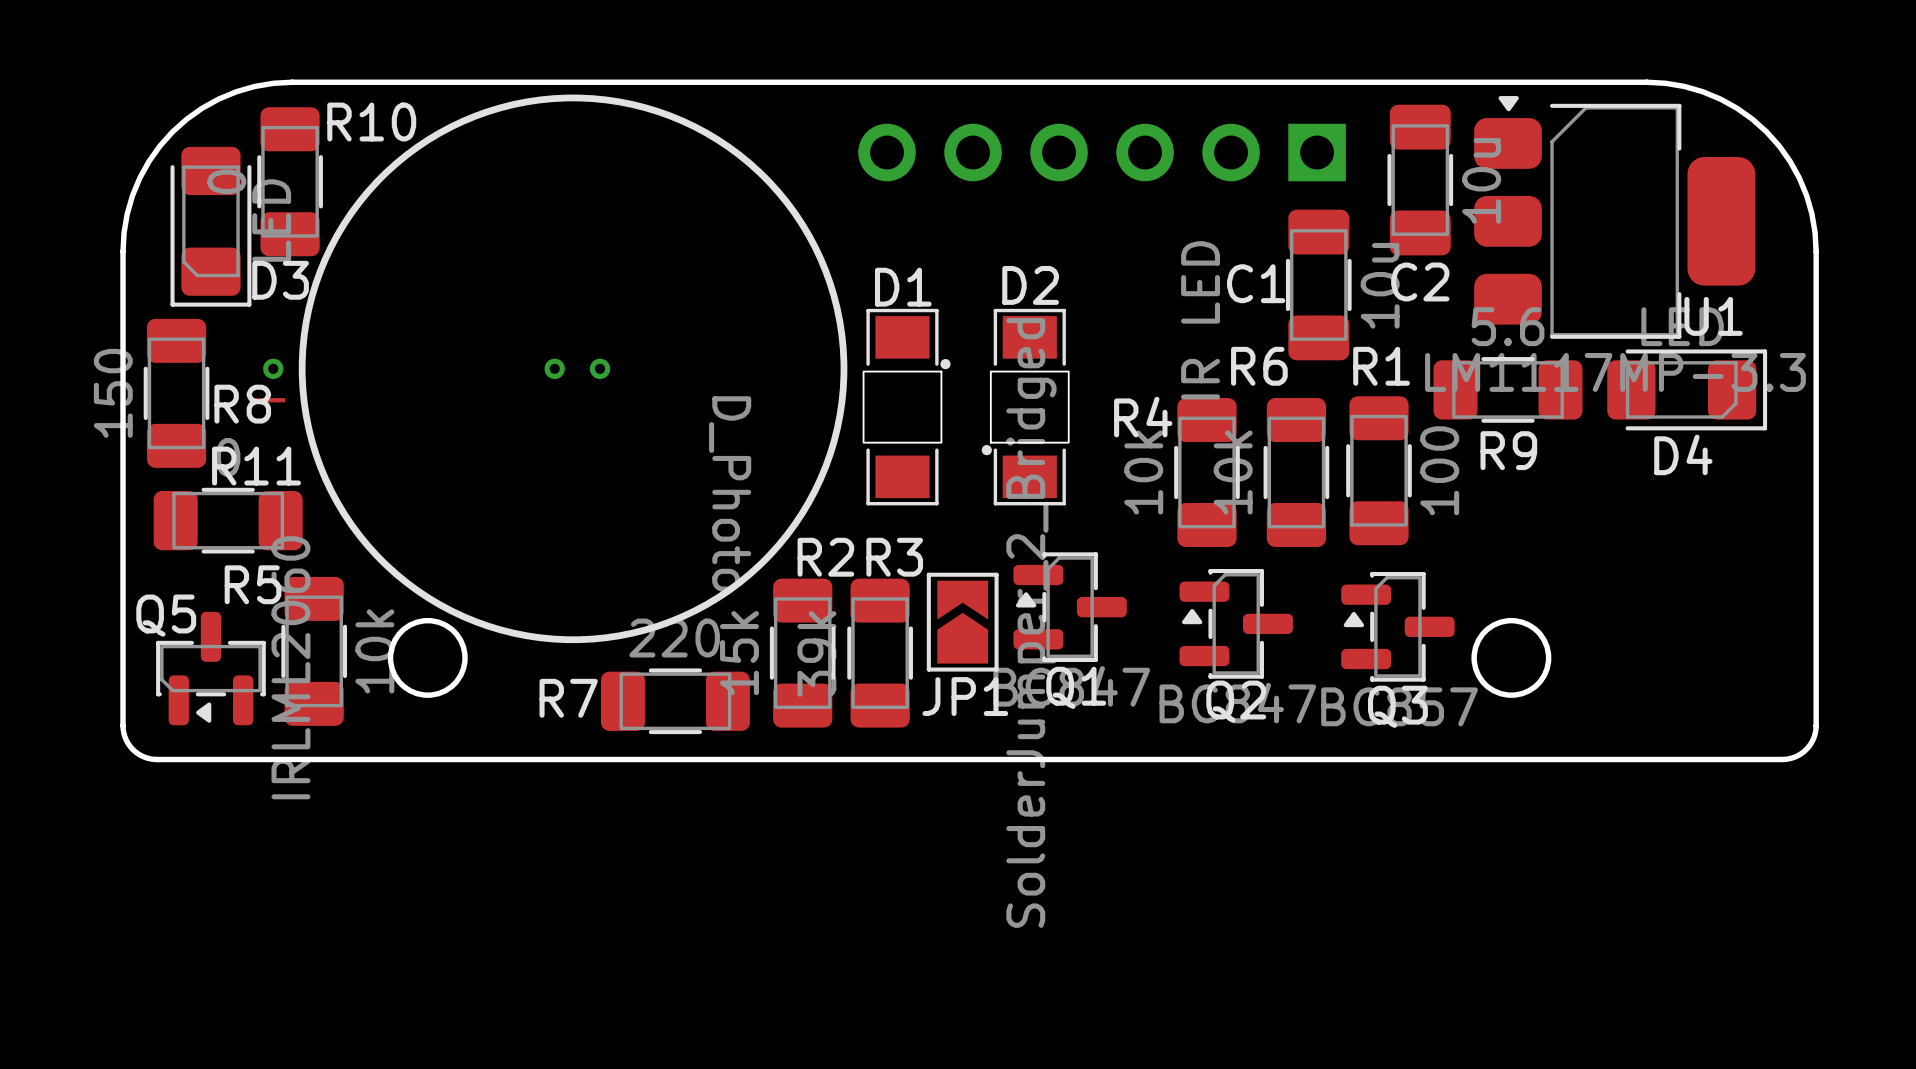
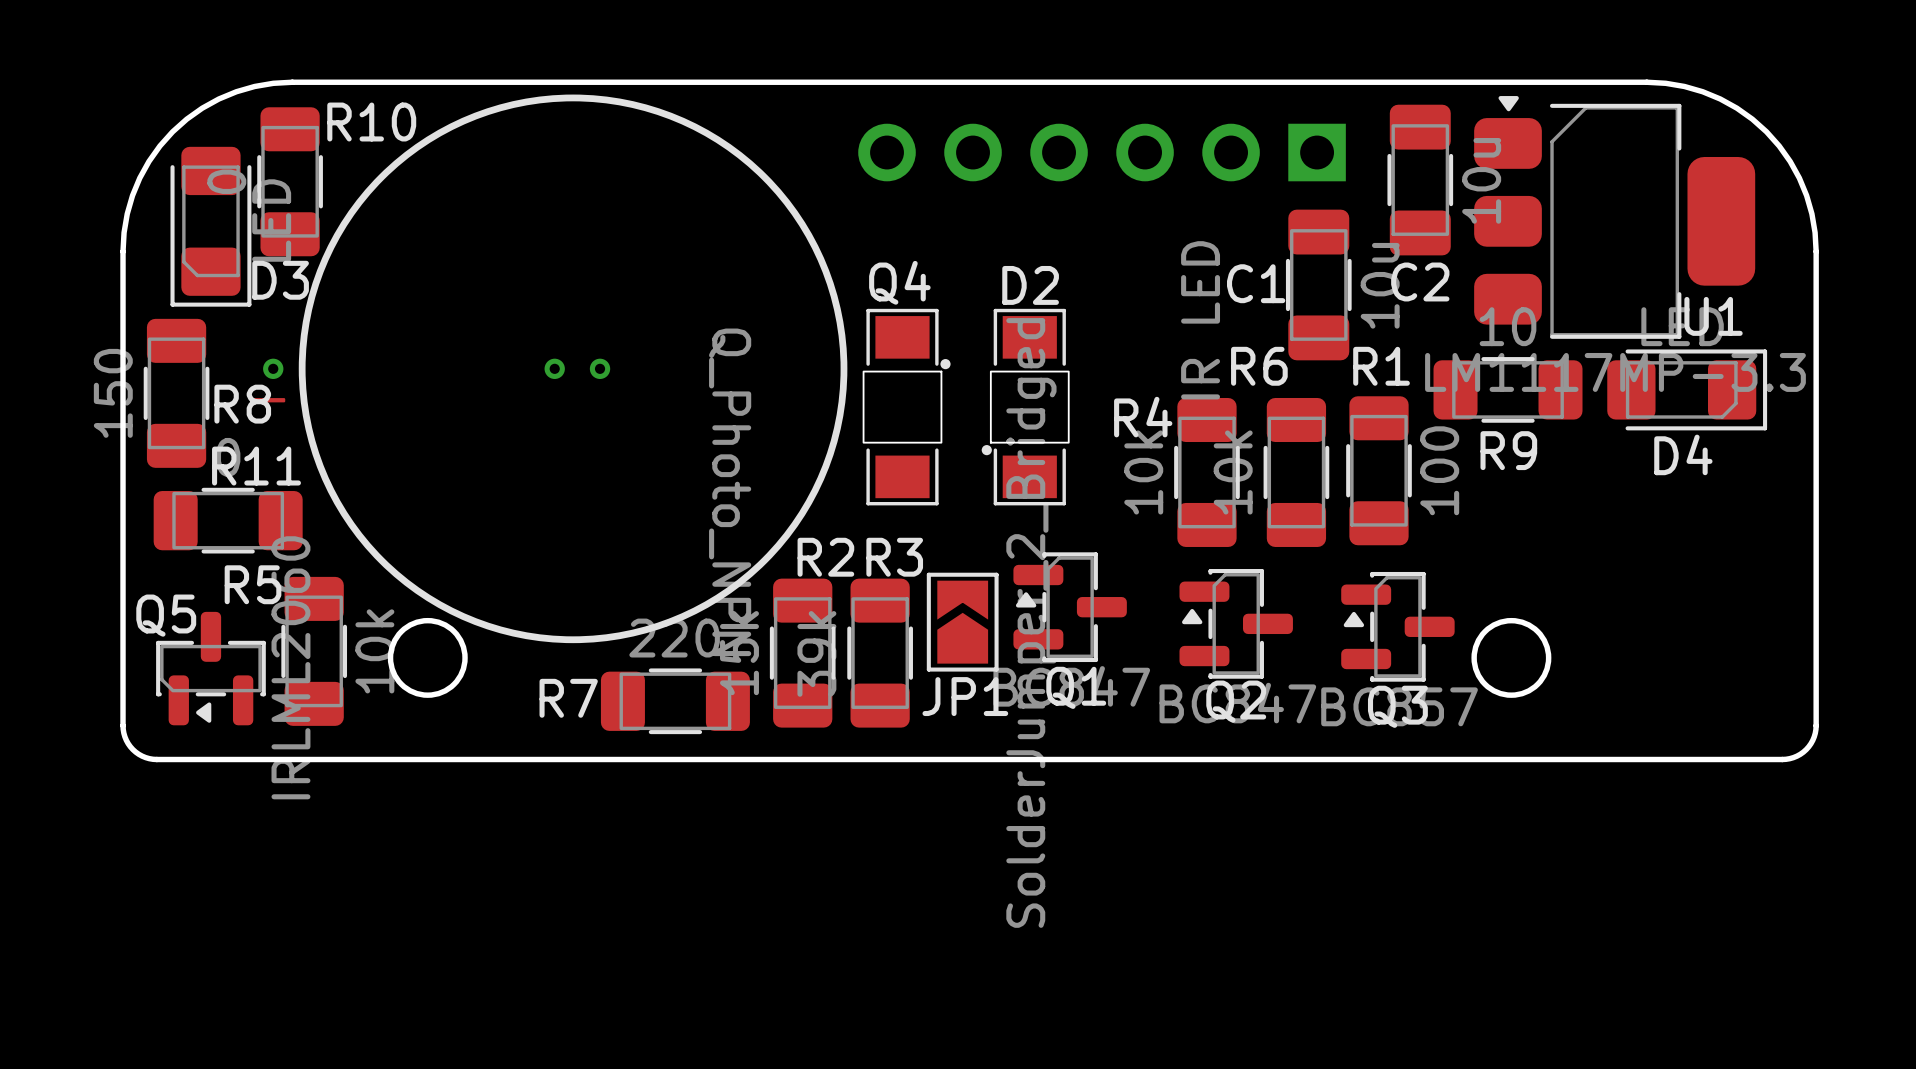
D1 name: D1 (903, 287) -> Q4 (899, 282)
R9 value: 5.6 (1508, 326) -> 10 (1508, 326)
D1 value: D_Photo (730, 493) -> Q_Photo_NPN (730, 492)

